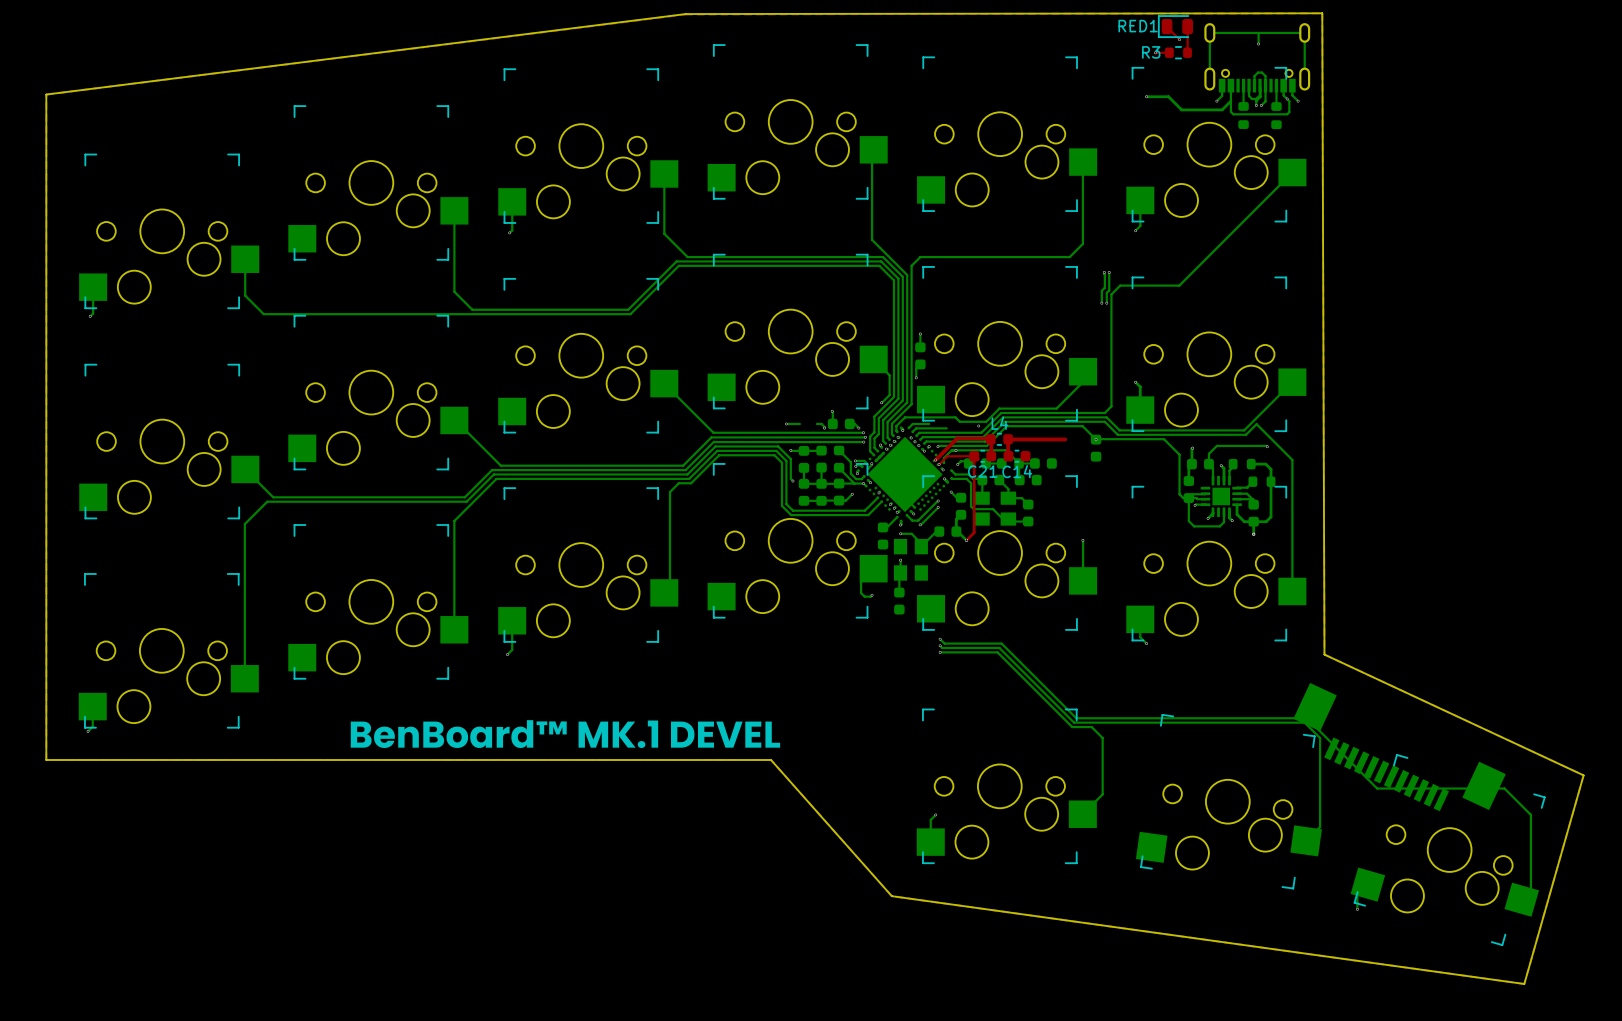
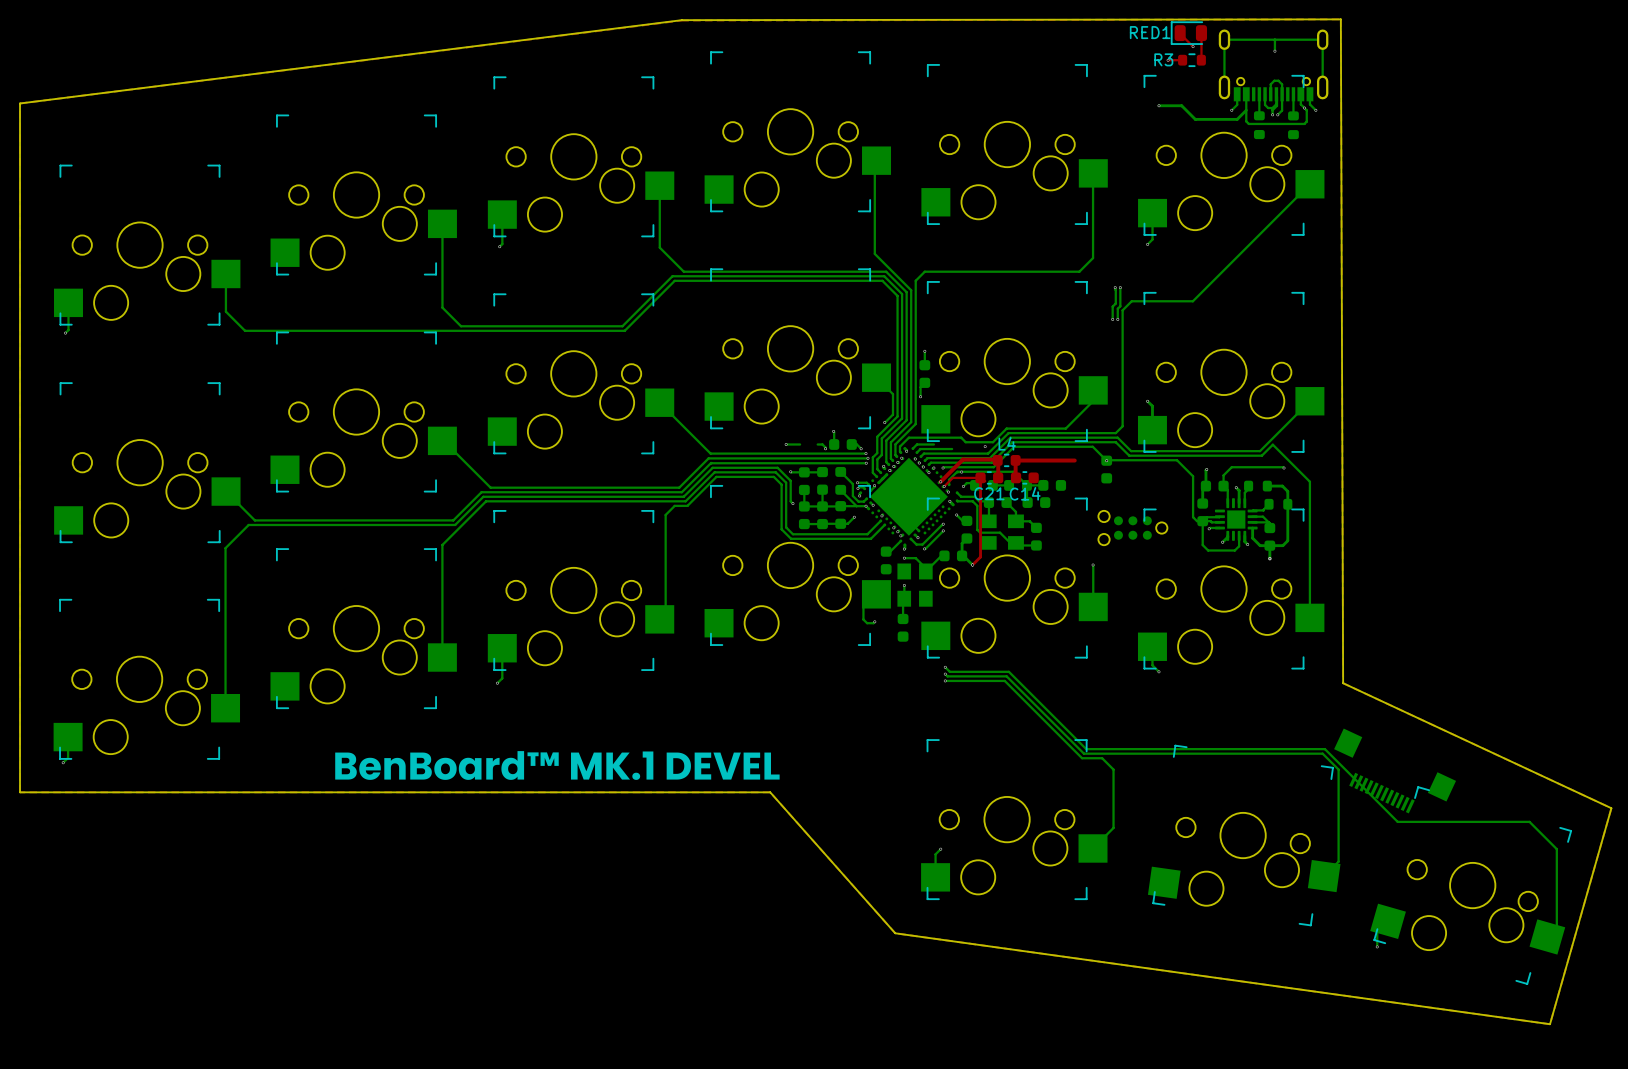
part: none -> (1132, 528)
part: none -> (1395, 770)
part: (1399, 747) -> none

